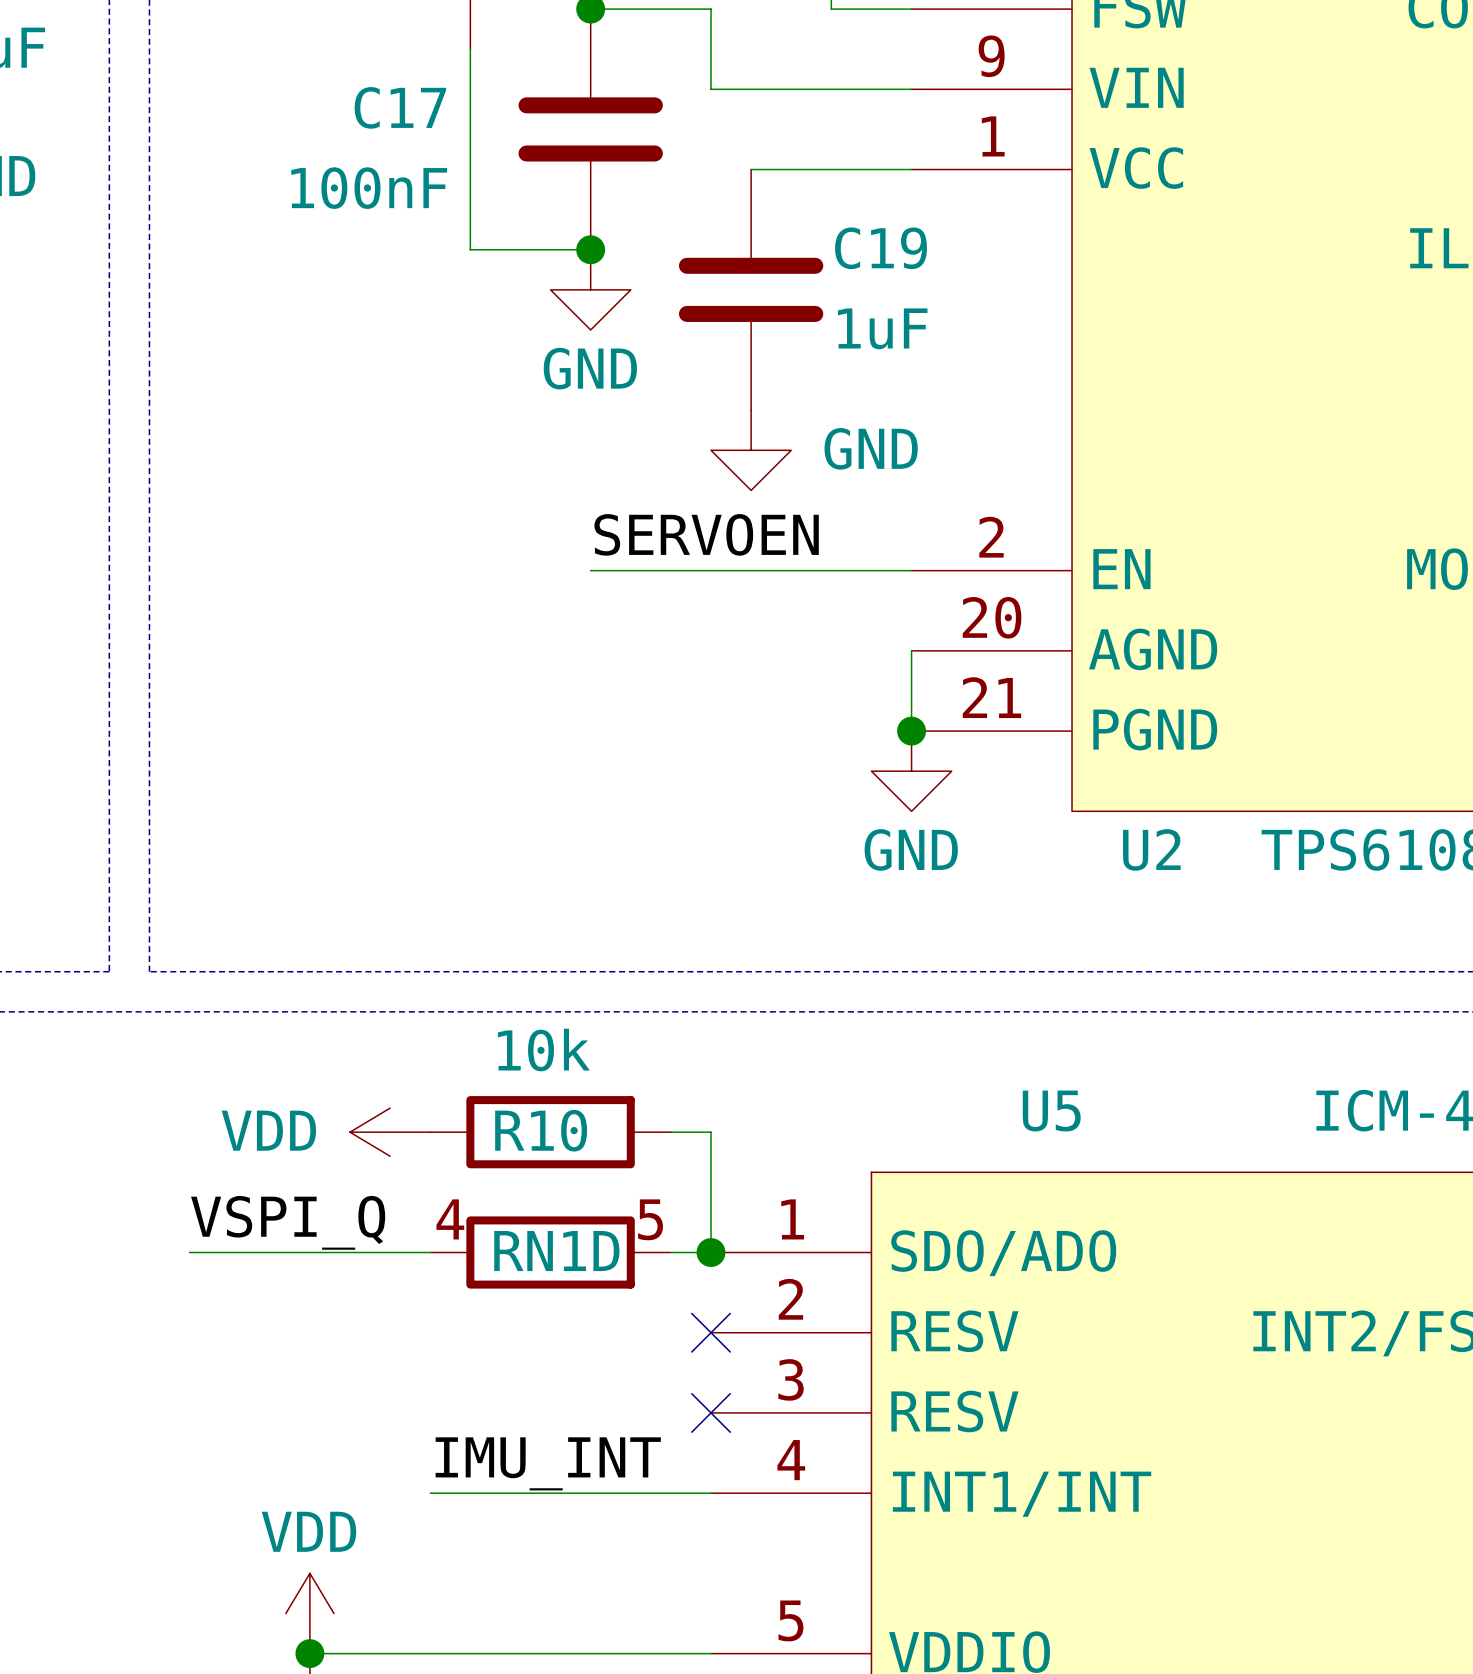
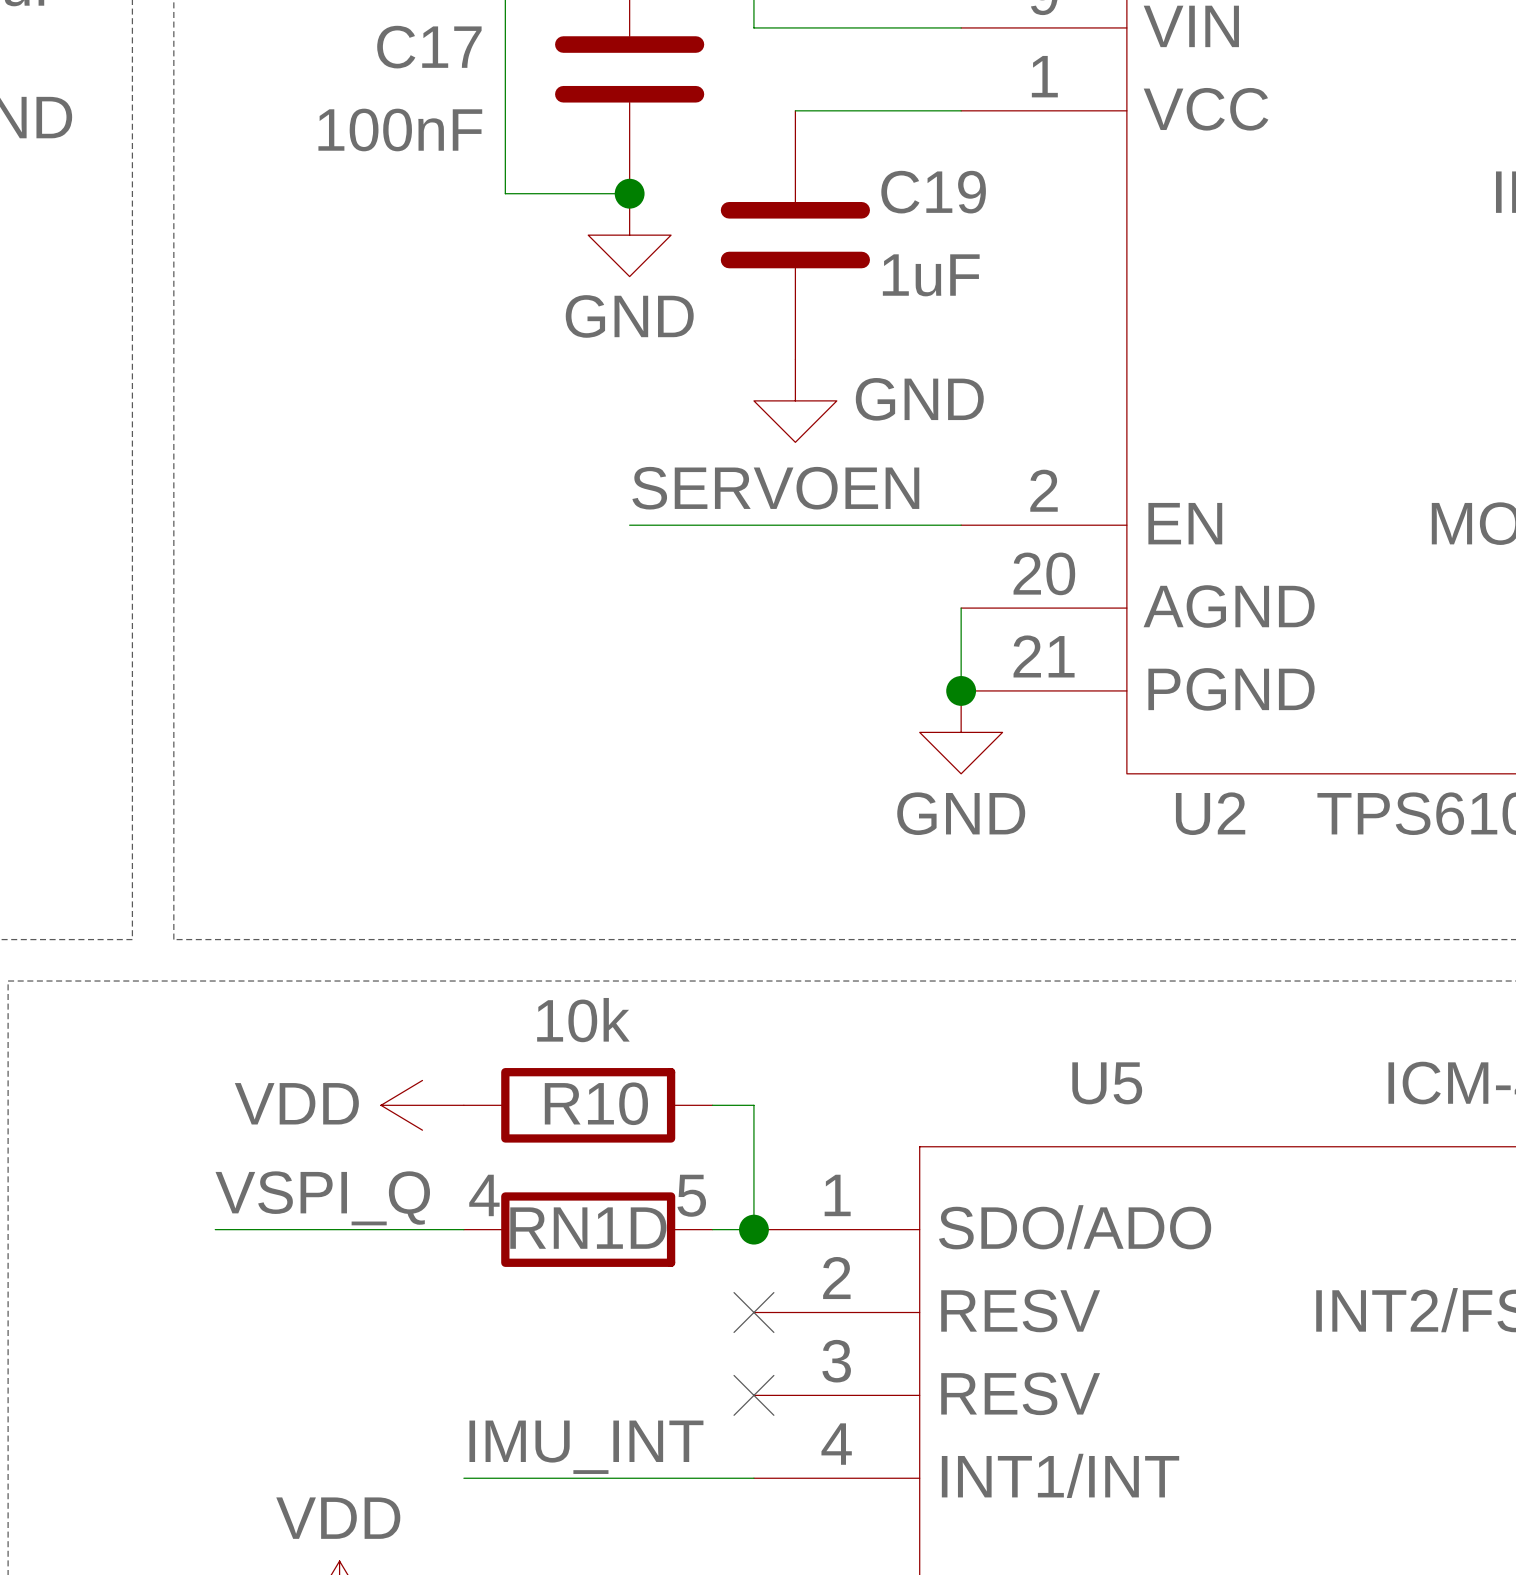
R10 name position: R10 (541, 1130) -> R10 (596, 1103)
RN1D name position: RN1D (556, 1251) -> RN1D (588, 1228)

